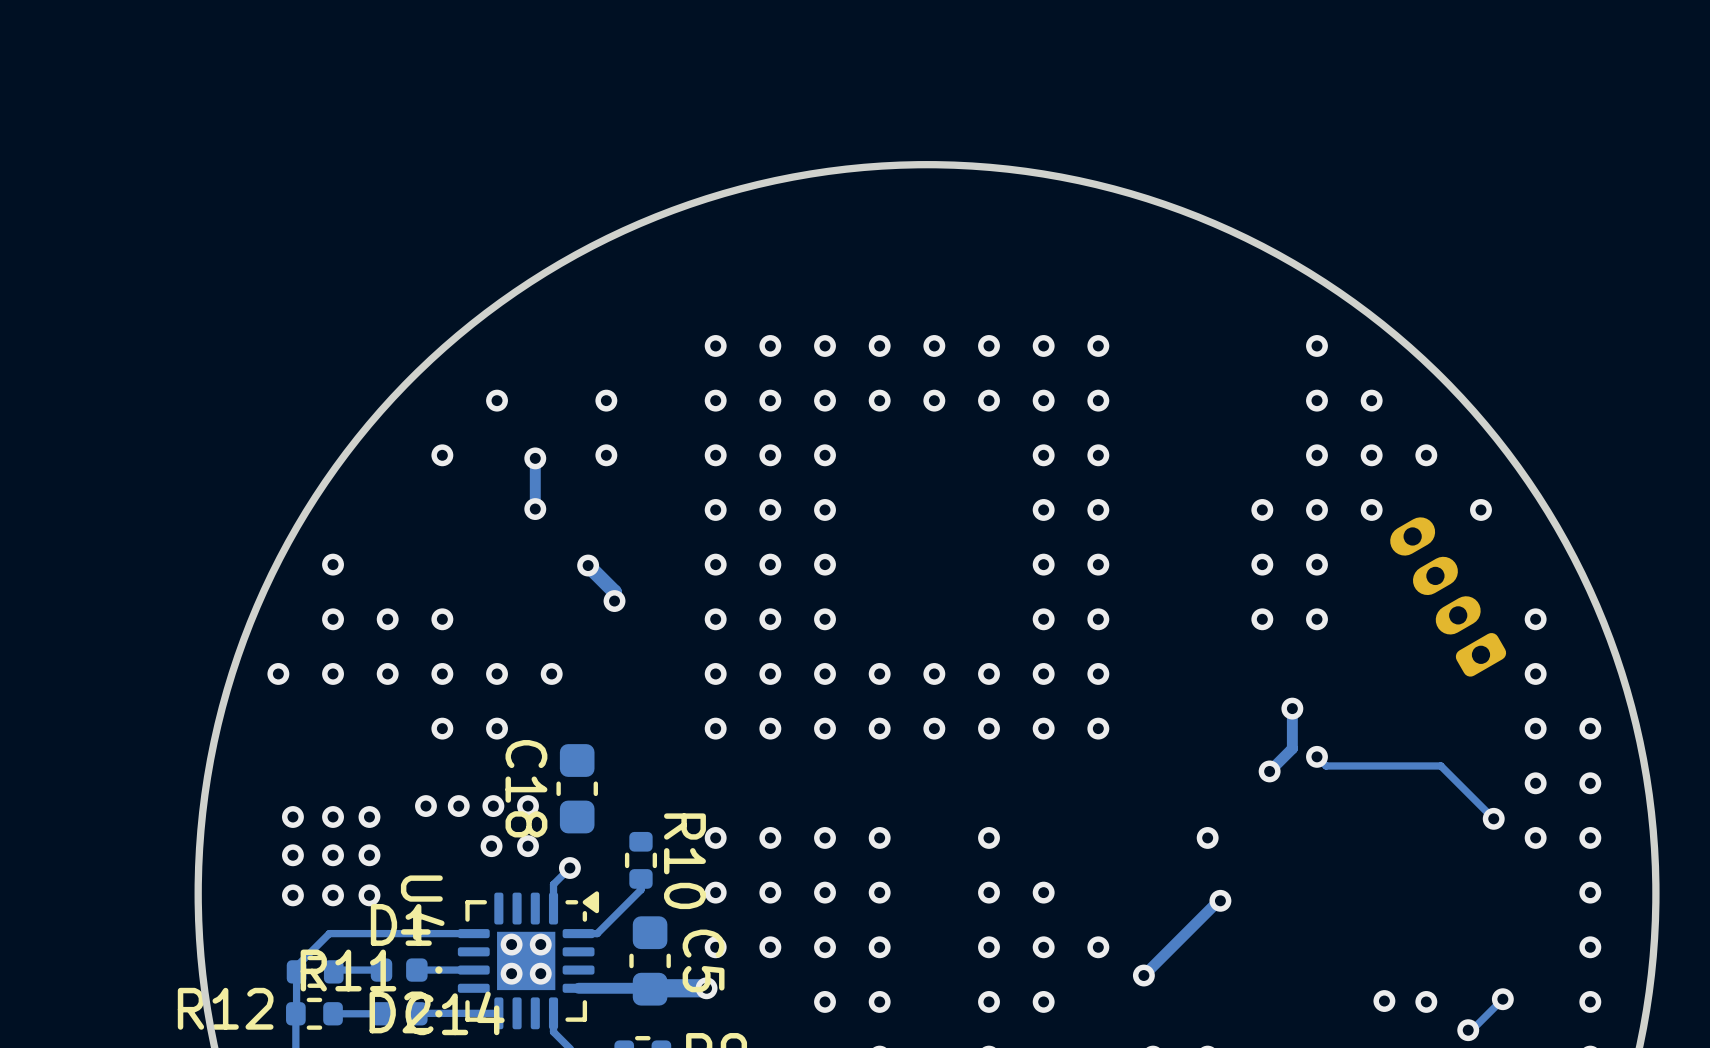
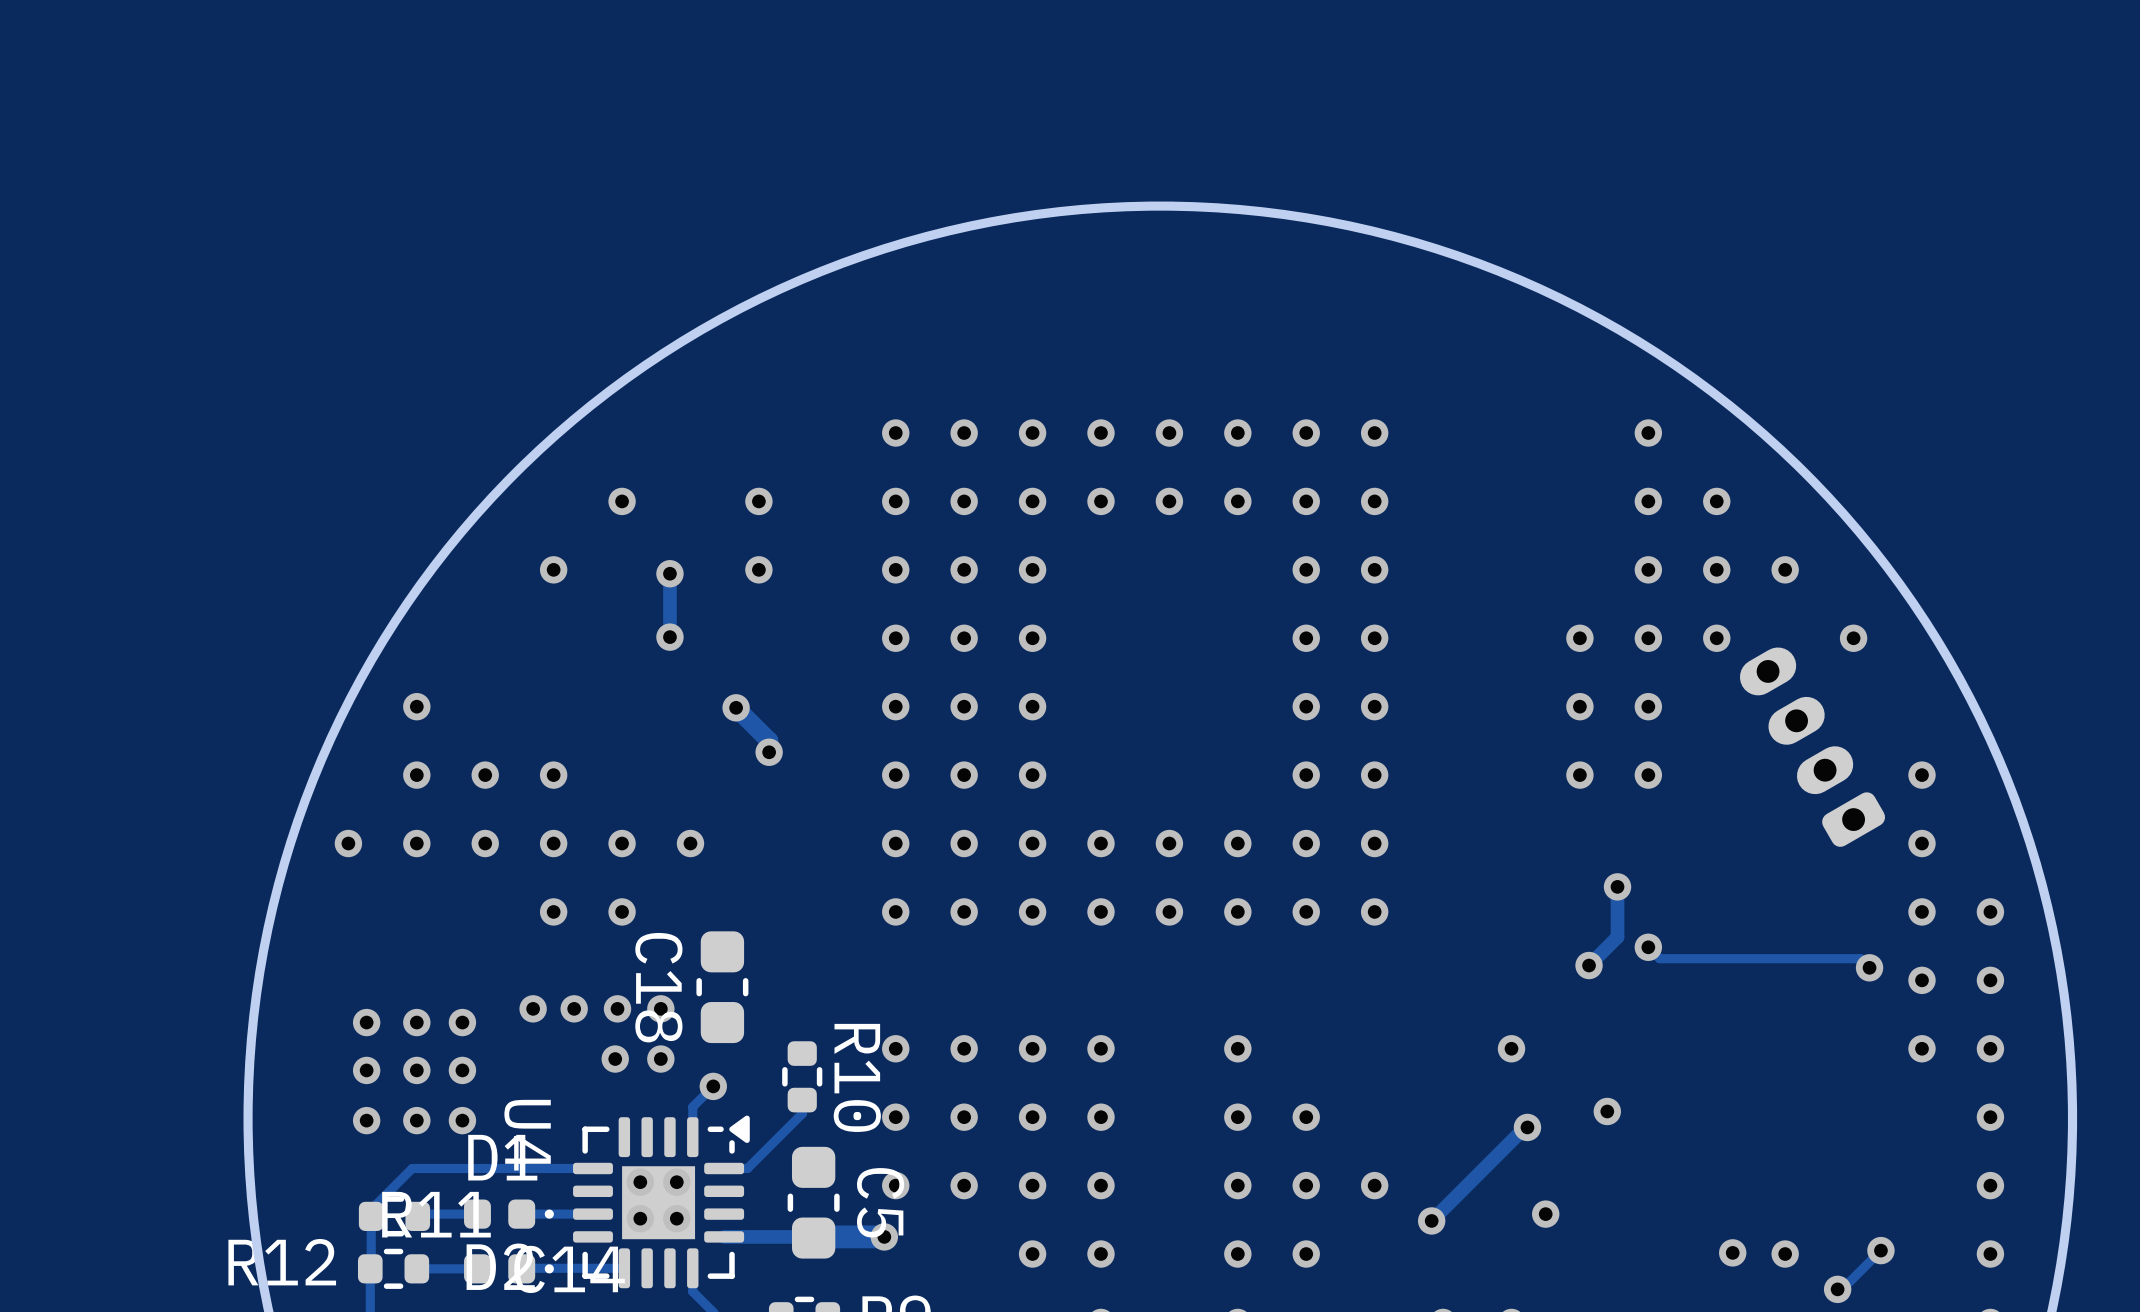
track: (1440, 765) (1493, 818) -> (1803, 958) (1860, 958) (1869, 967)
via position: (1493, 818) -> (1869, 967)
via: none -> (1607, 1111)
via: none -> (1545, 1214)

